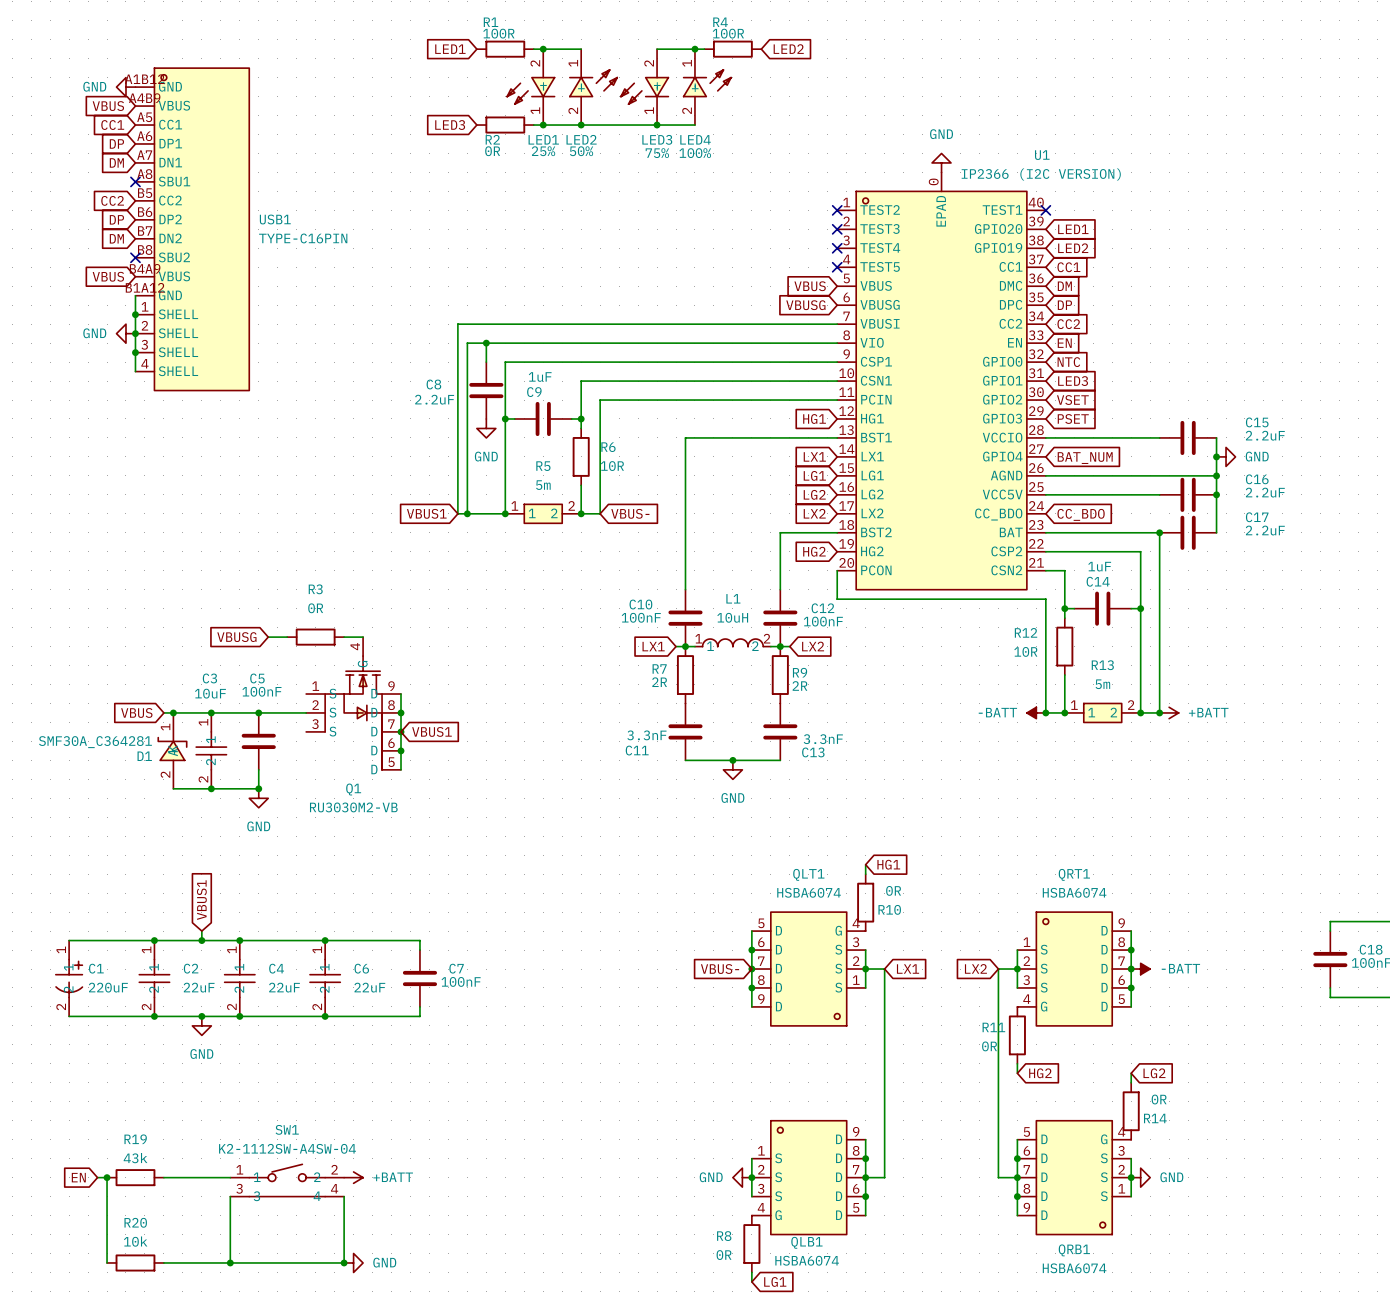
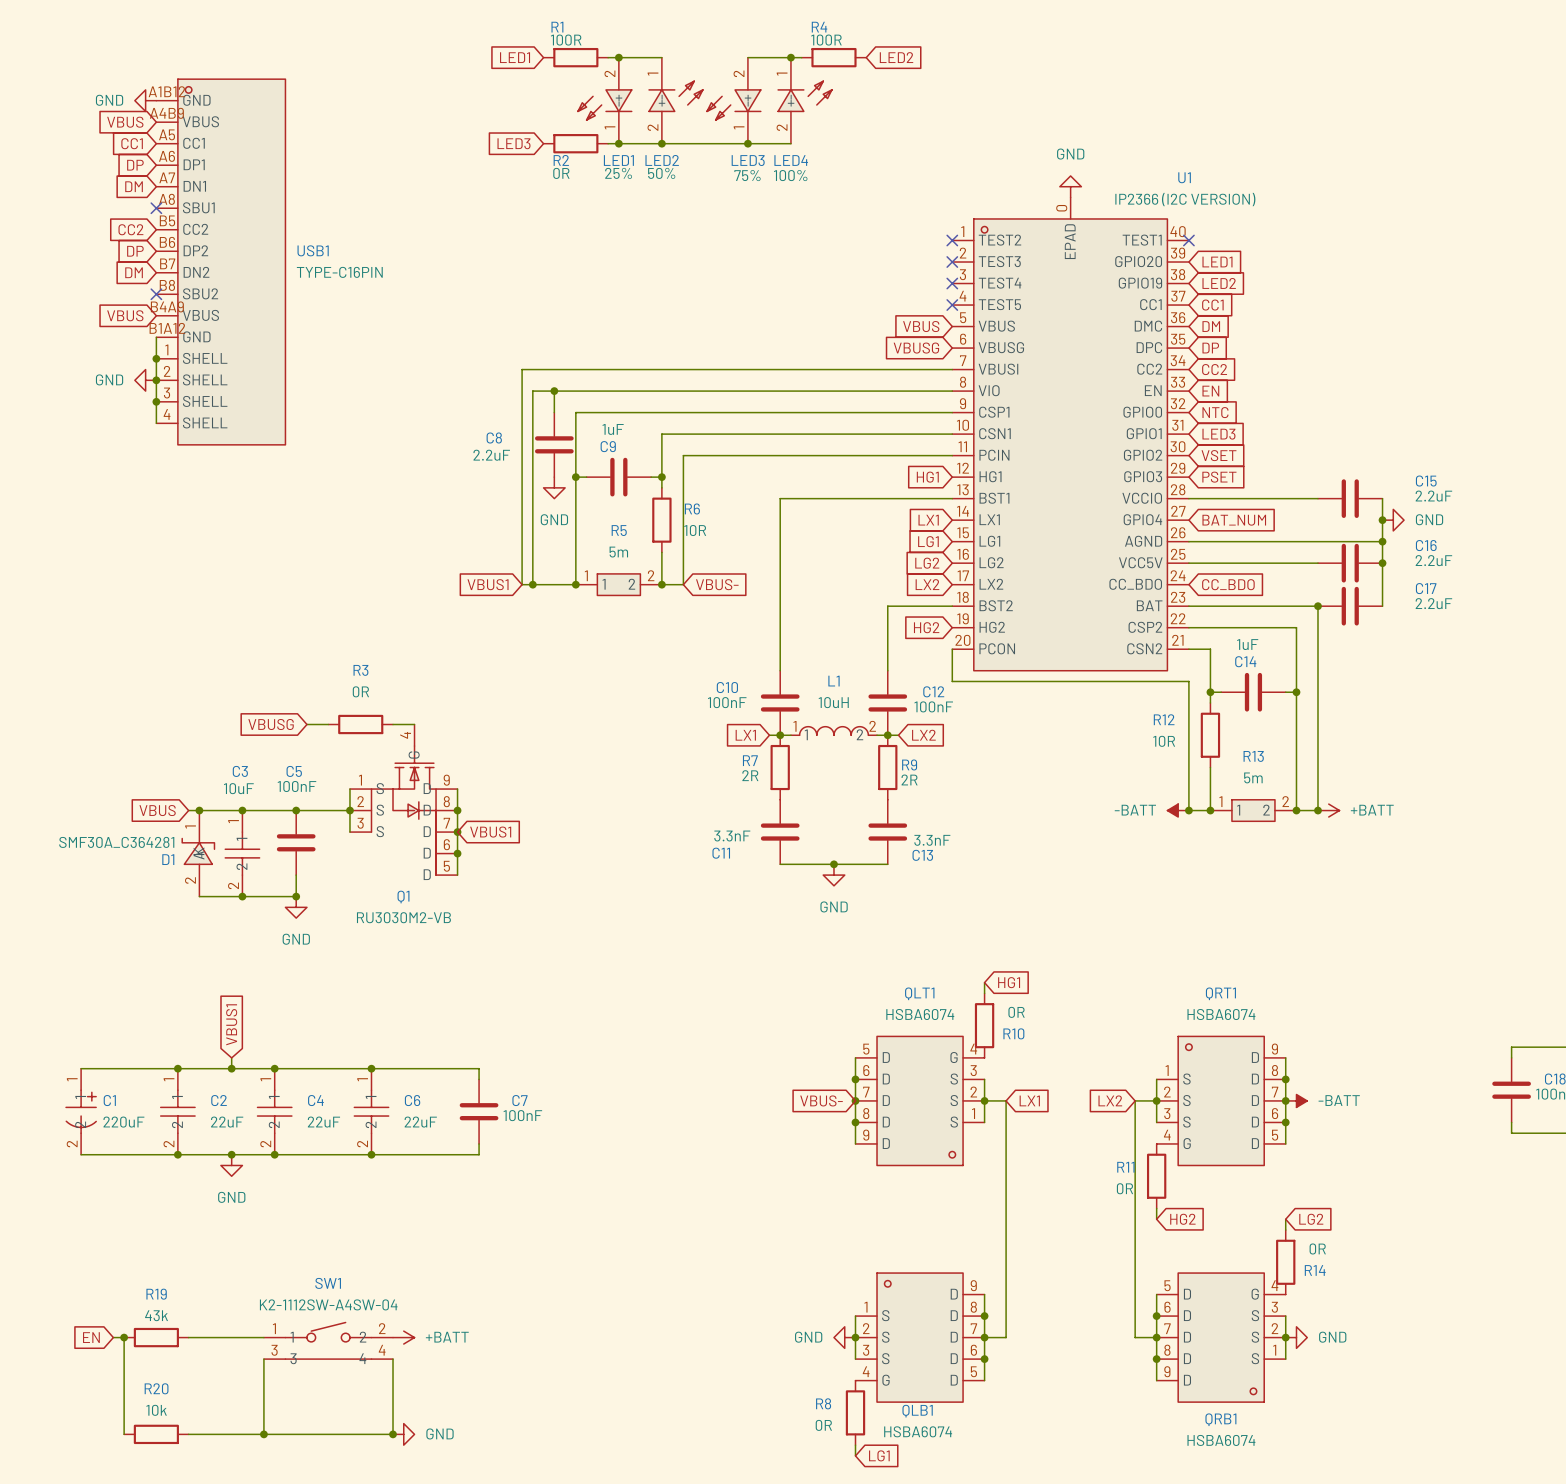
wire: none -> (349, 789) (349, 832)
junction: none -> (349, 810)

